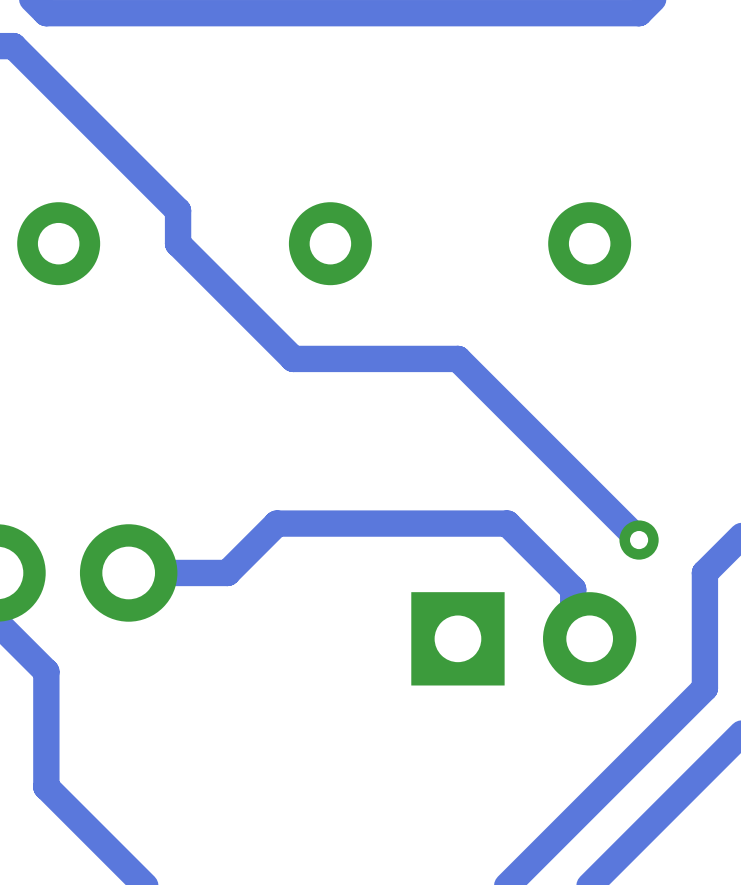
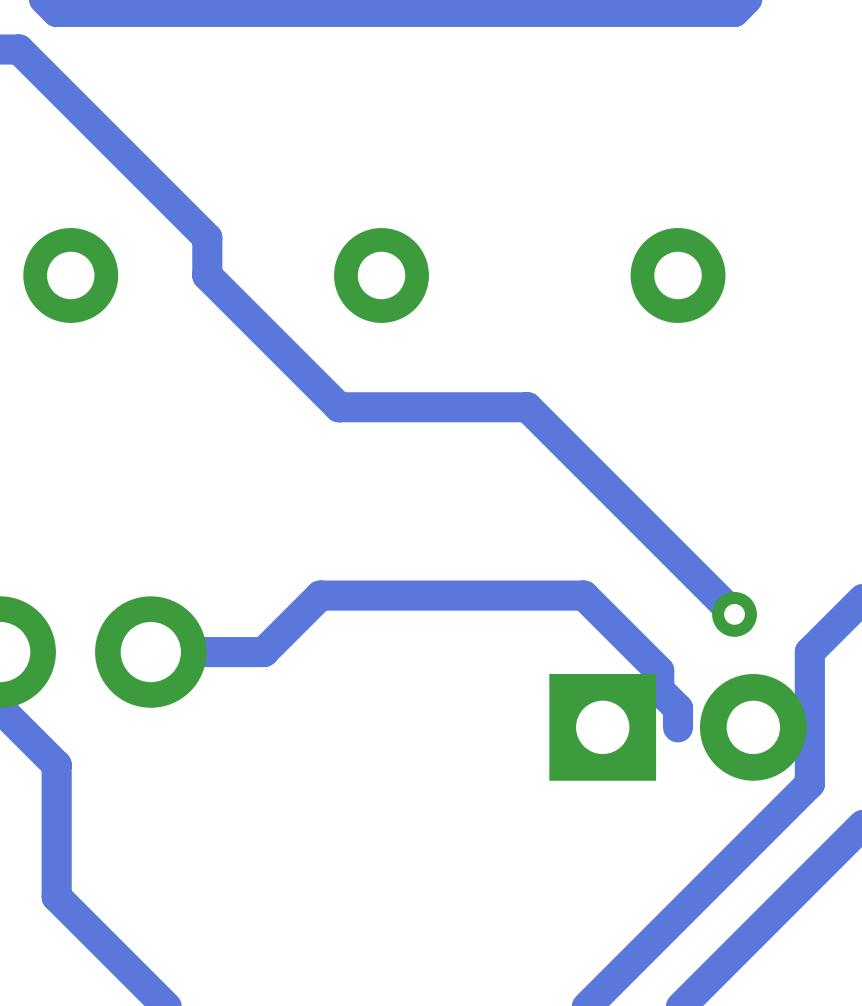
part position: (523, 638) -> (678, 727)

